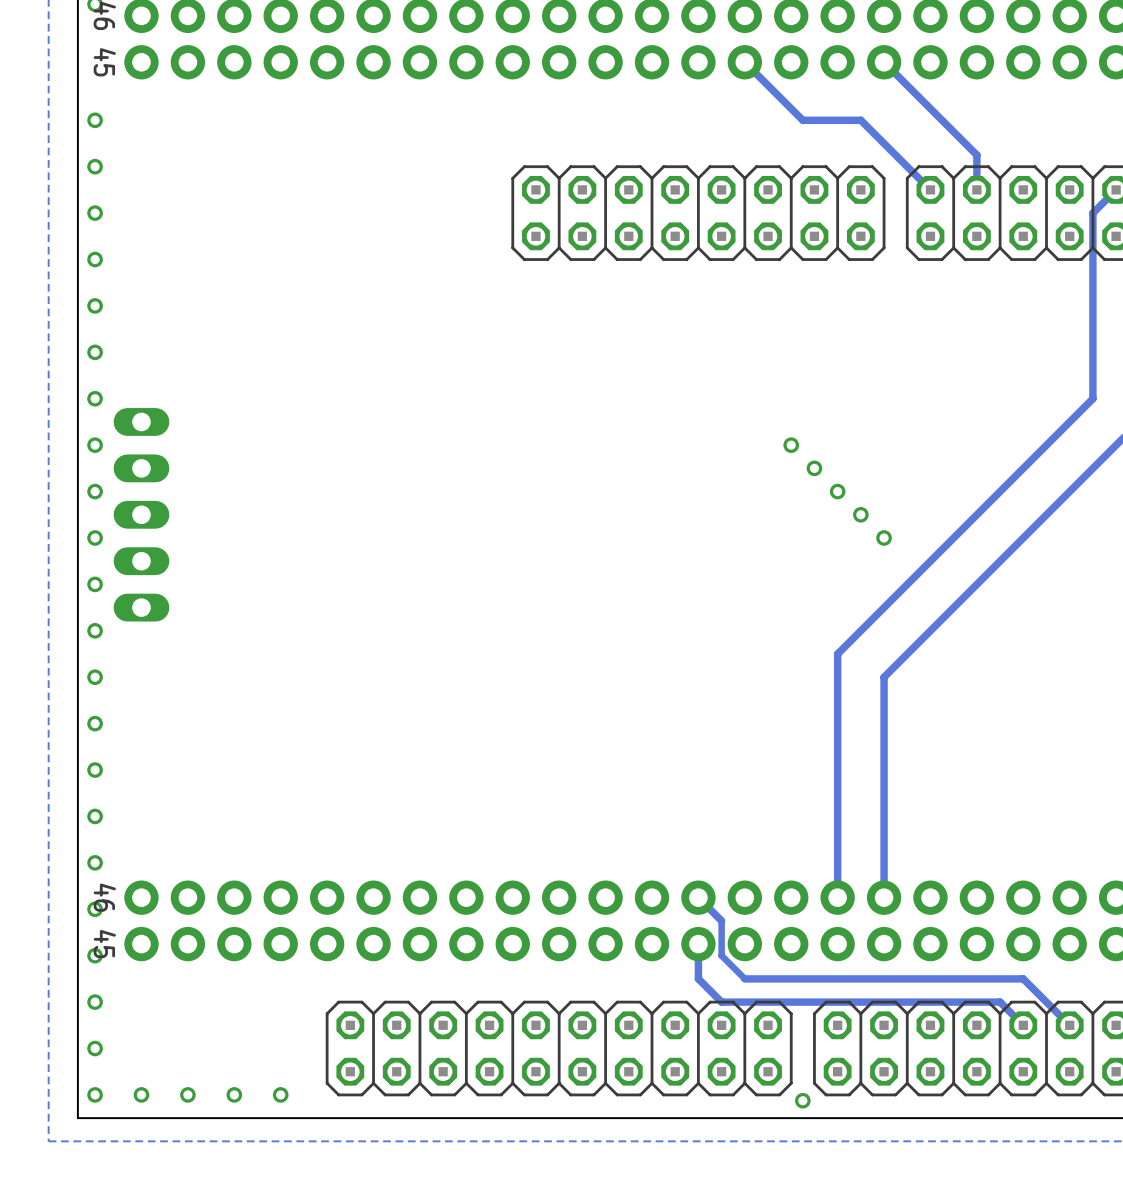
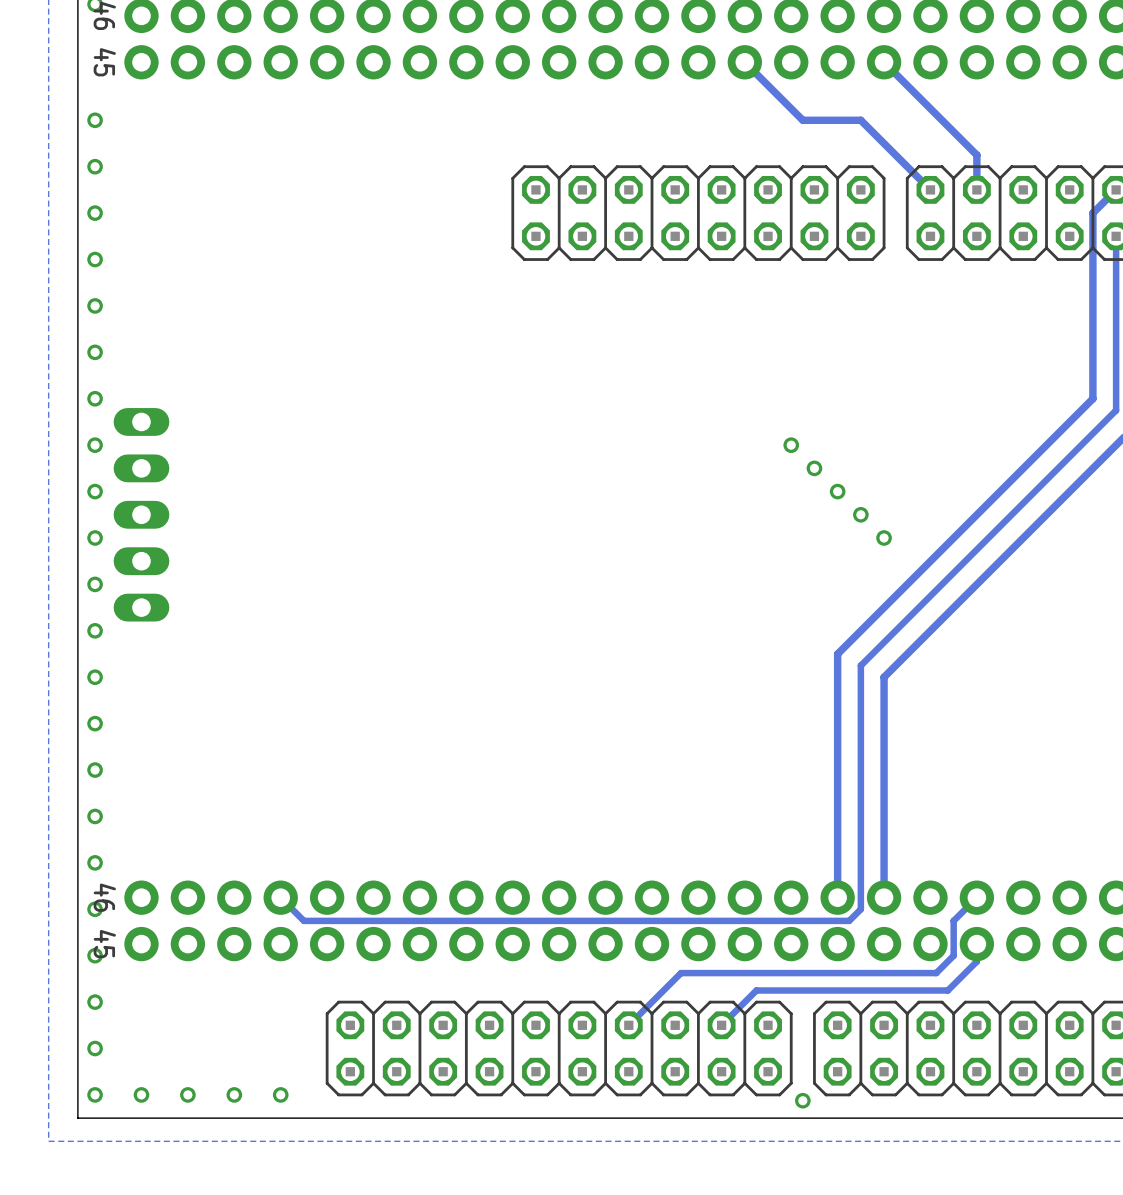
track: none -> (1116, 236) (1116, 410) (860, 665) (860, 909) (849, 920) (303, 920) (280, 897)
track: (698, 897) (721, 920) (721, 955) (744, 978) (1023, 978) (1069, 1025) -> none
track: none -> (976, 897) (953, 920) (953, 955) (936, 973) (681, 973) (628, 1025)
track: (698, 944) (698, 978) (721, 1002) (1000, 1002) (1023, 1025) -> none
track: none -> (976, 944) (976, 961) (947, 990) (756, 990) (721, 1025)

